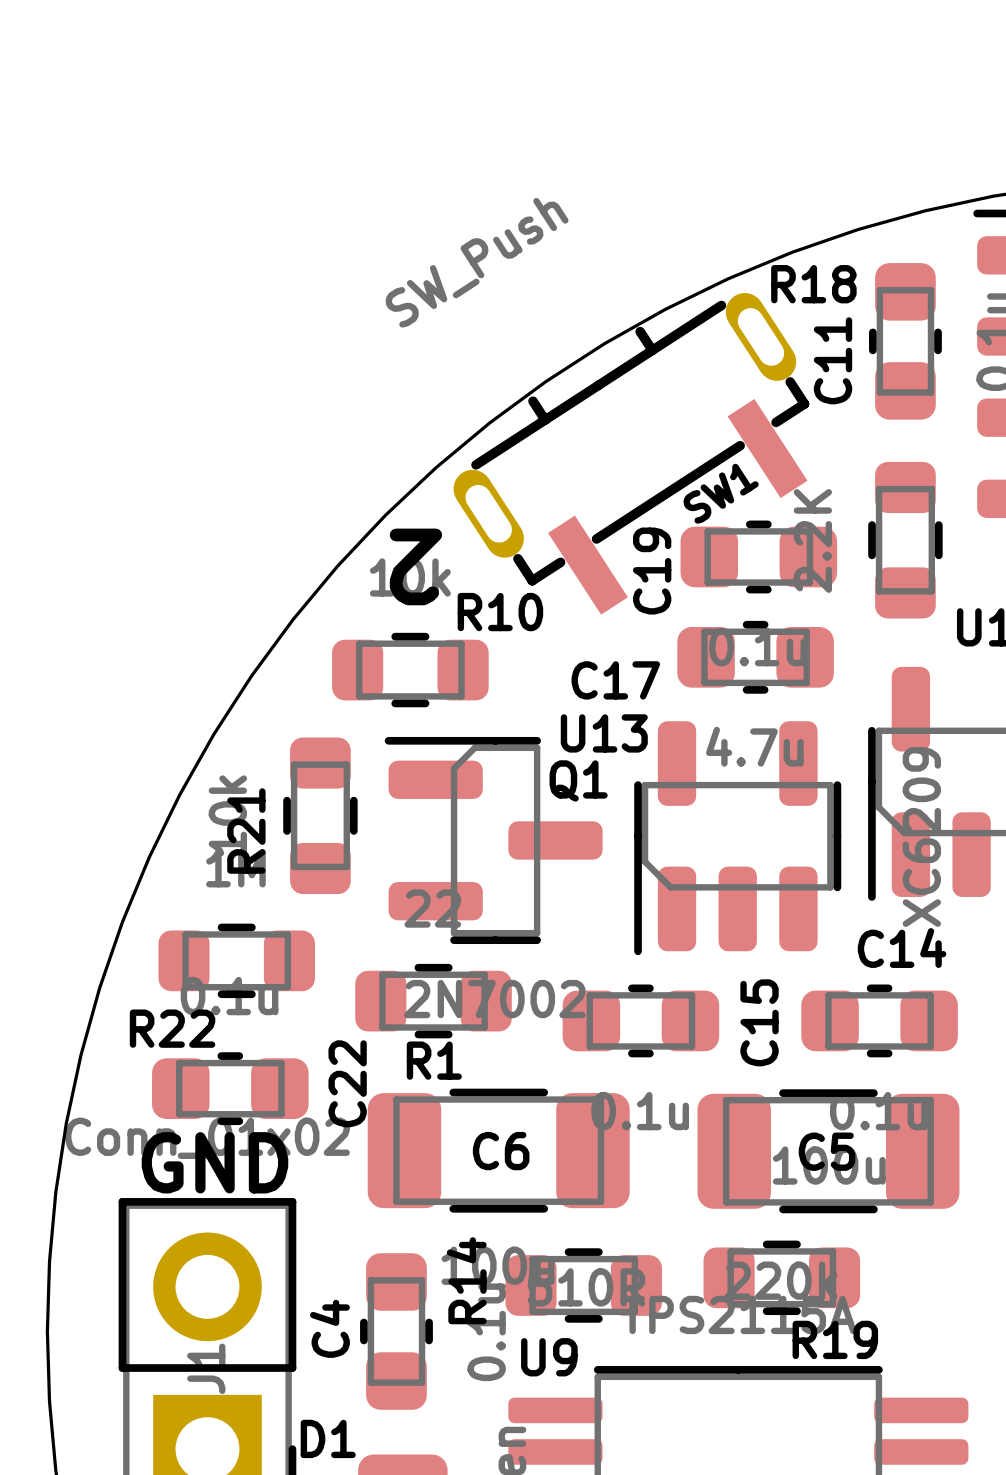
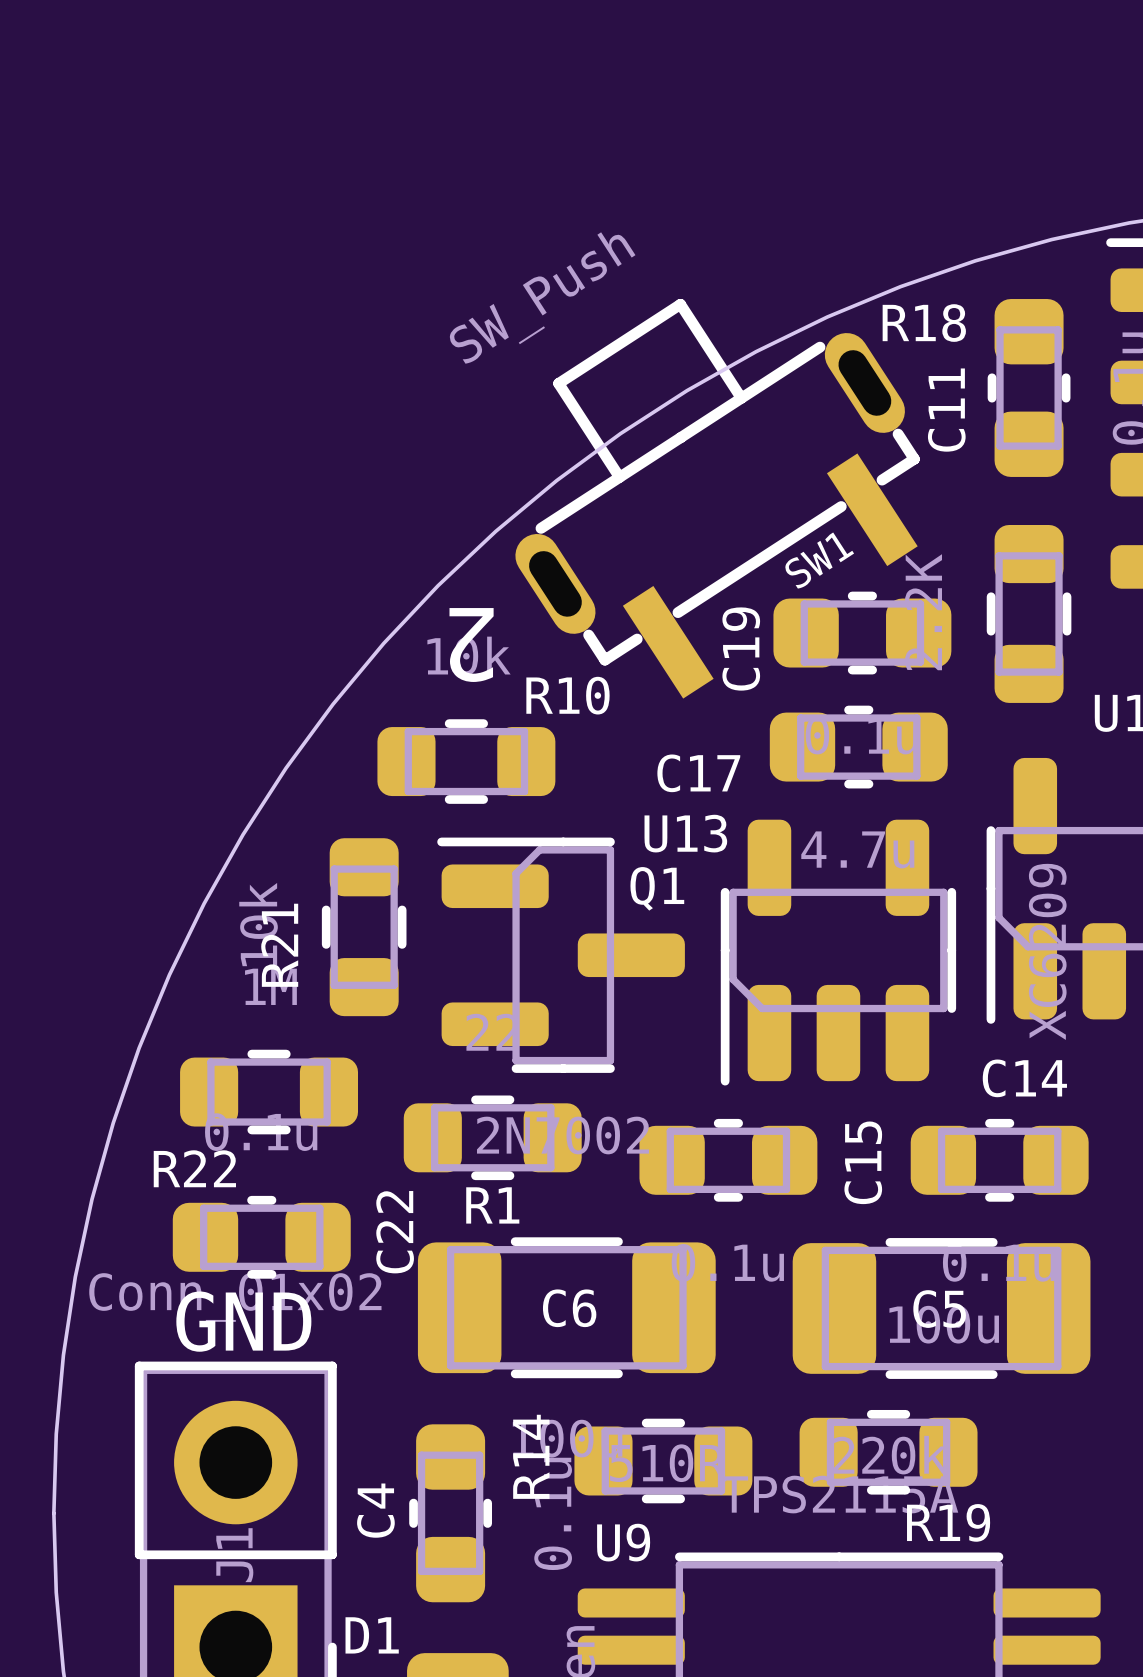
SW1 footprint: [453, 293, 810, 615] -> [515, 298, 920, 699]

